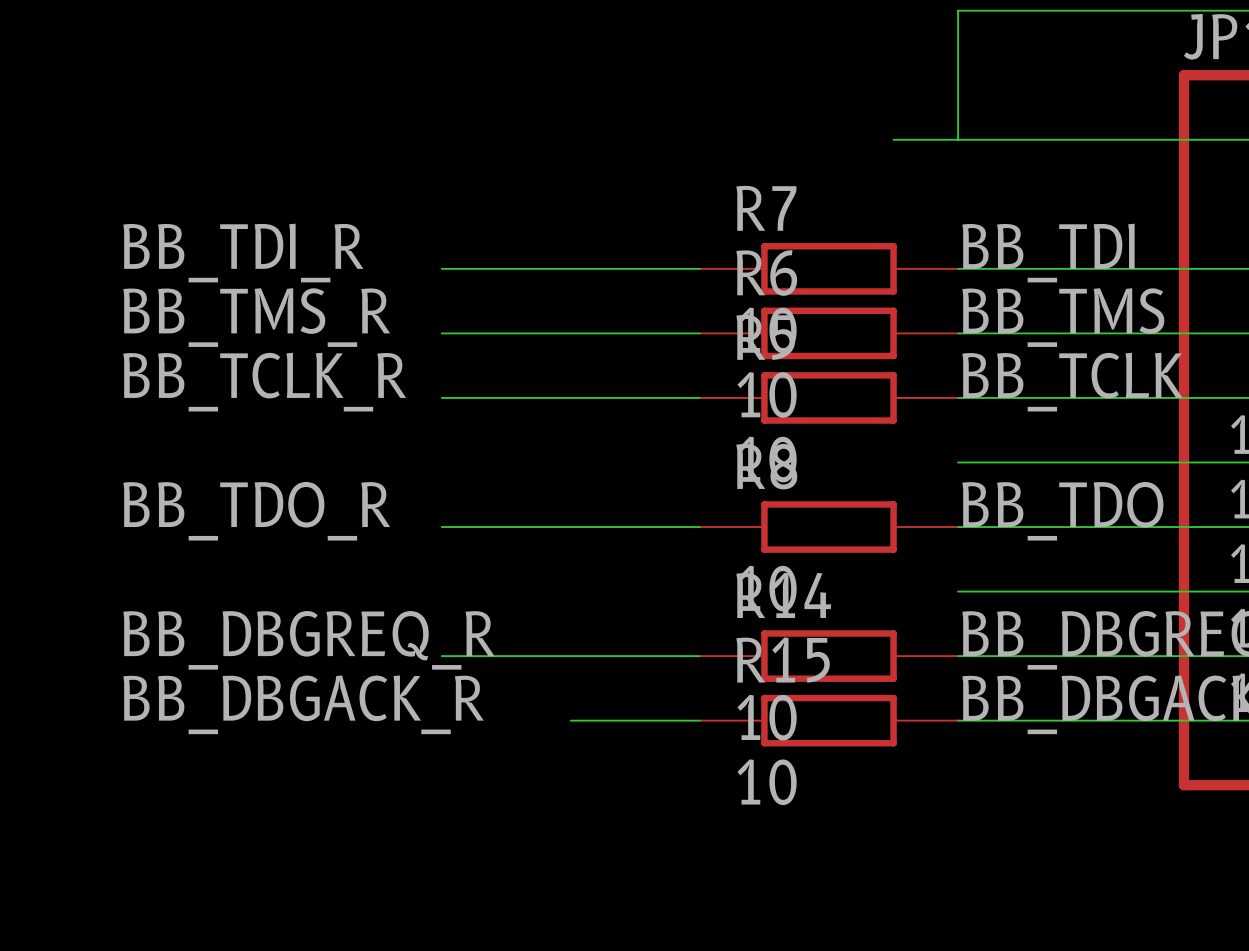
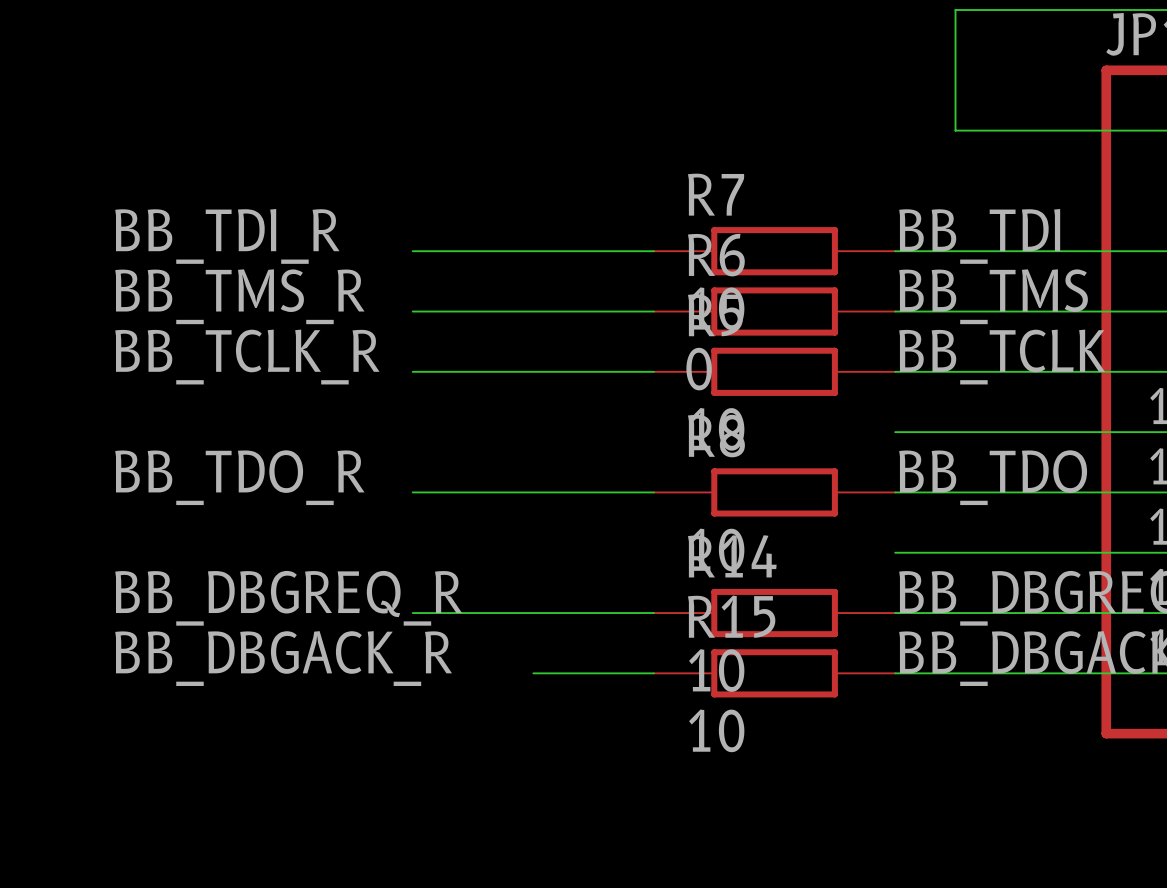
wire: (1022, 10) (958, 10) (958, 139) -> (955, 9) (955, 130)
wire: (893, 139) (1022, 139) -> none
R6 value: 10 (767, 394) -> 0 (699, 369)

